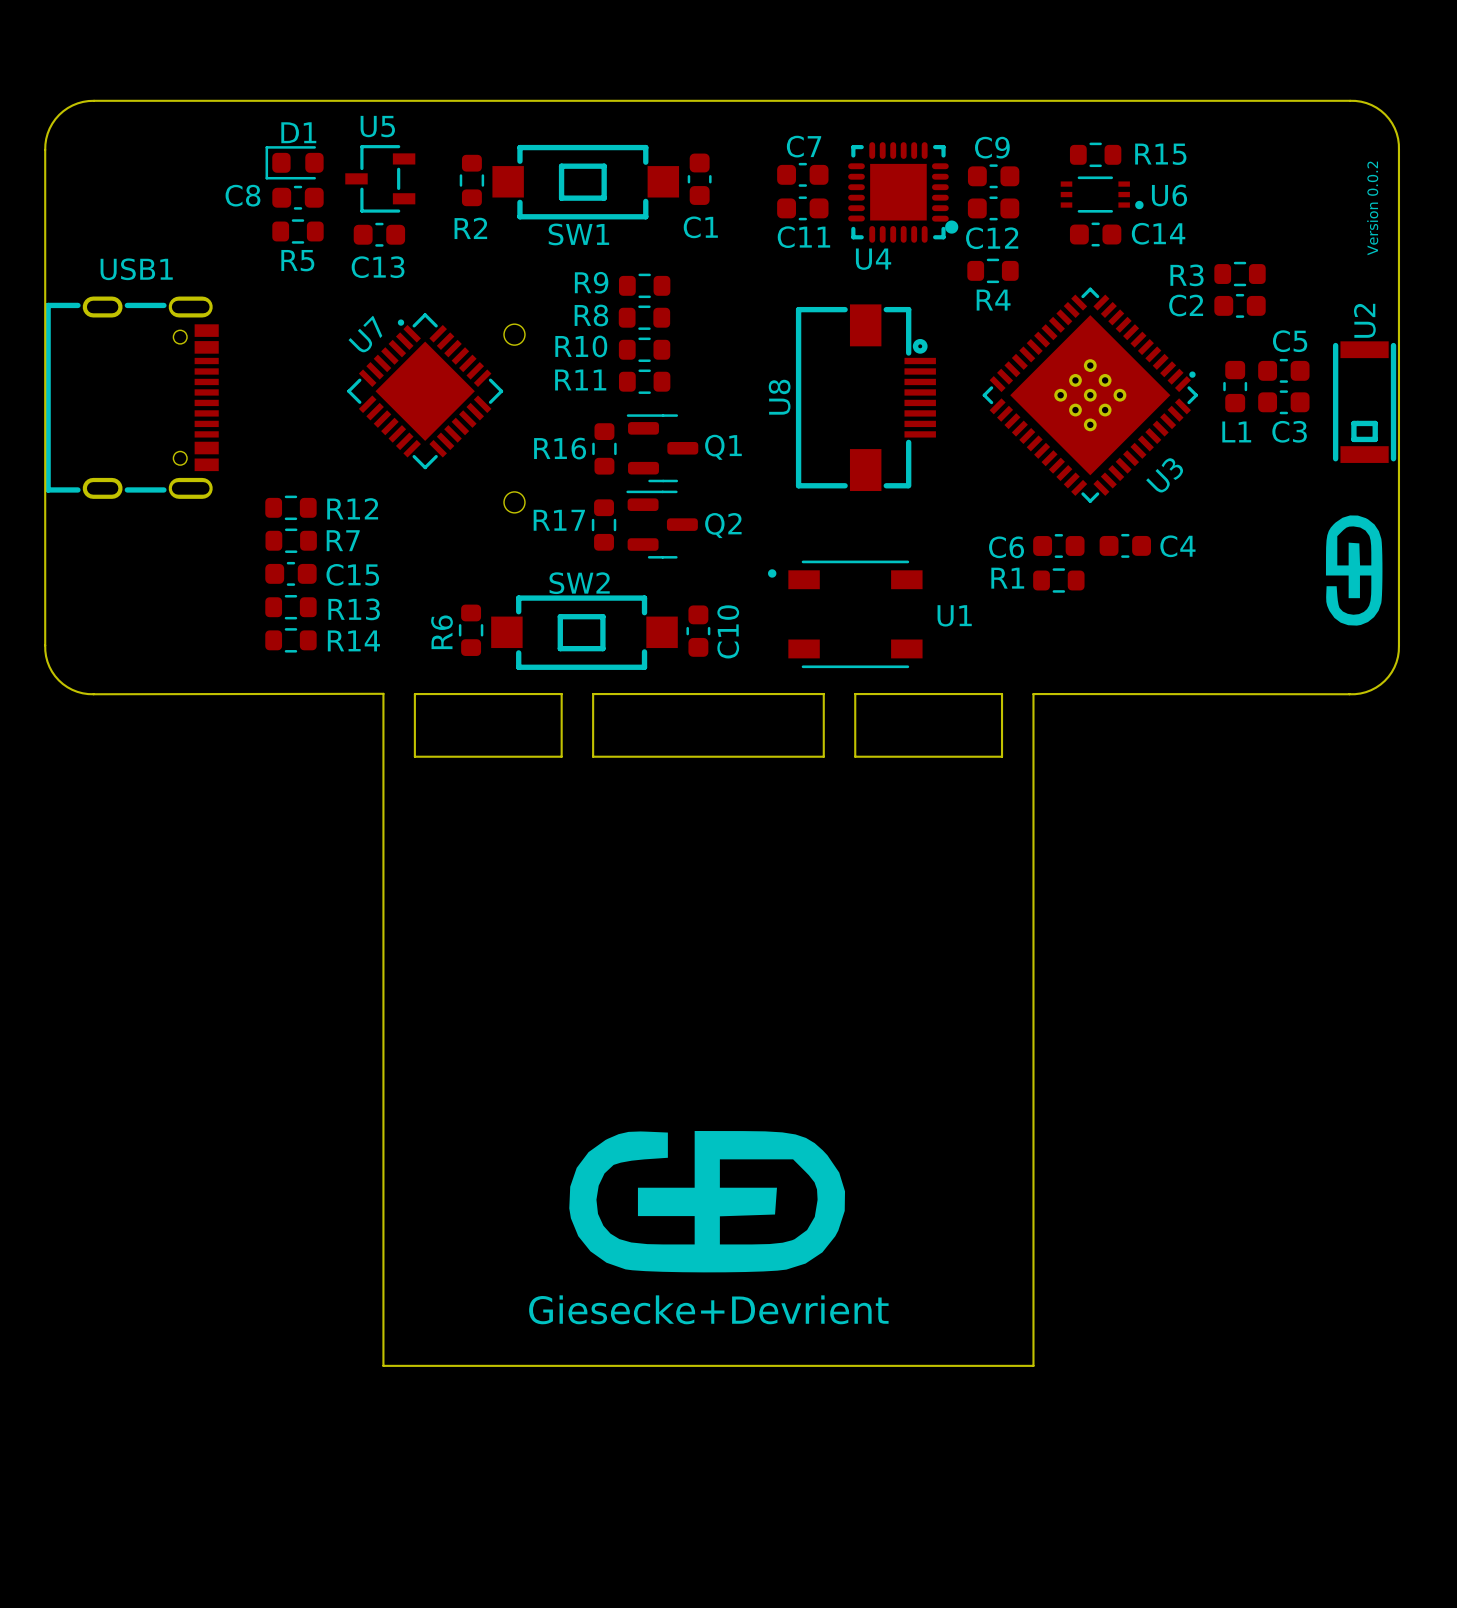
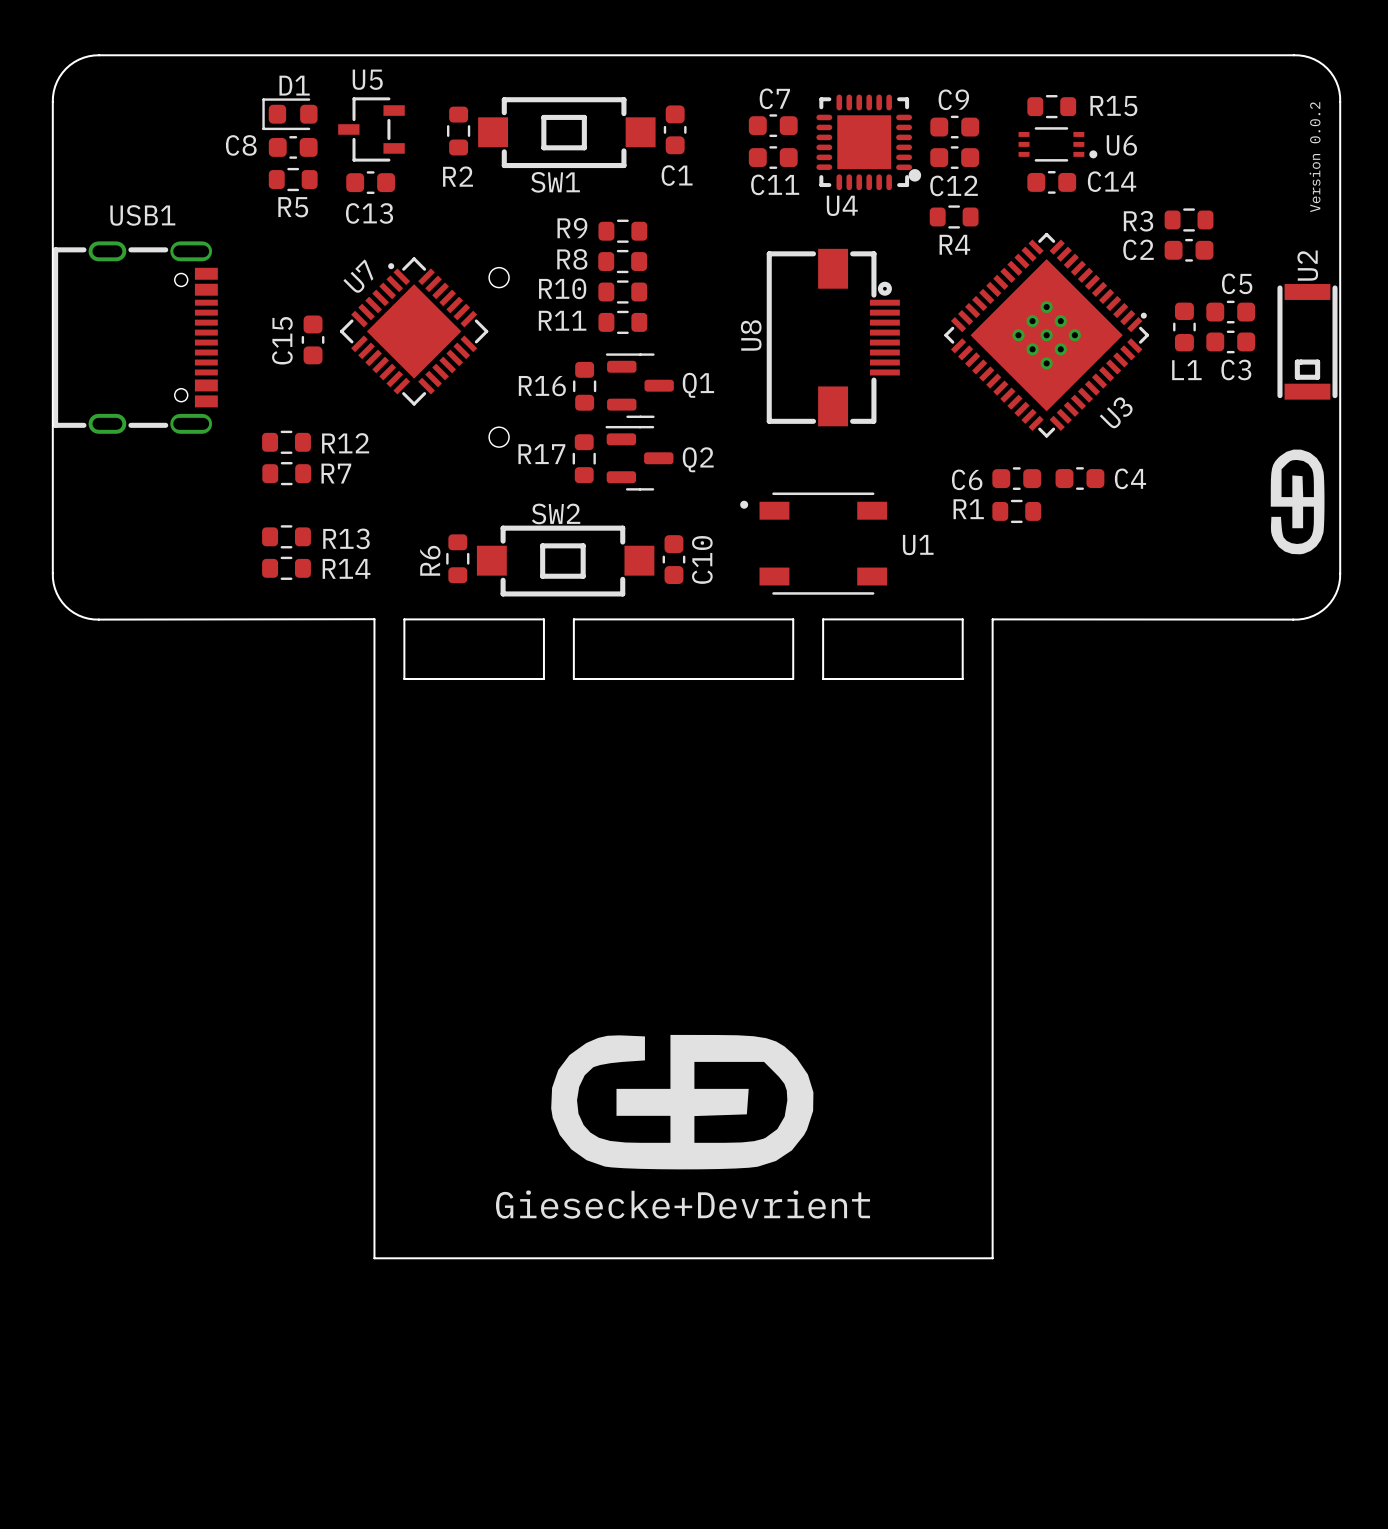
C15 rotation: 0° (290, 573) -> 90° clockwise (313, 339)
C15 position: (290, 573) -> (313, 339)
C15 name position: C15 (352, 574) -> C15 (282, 340)

